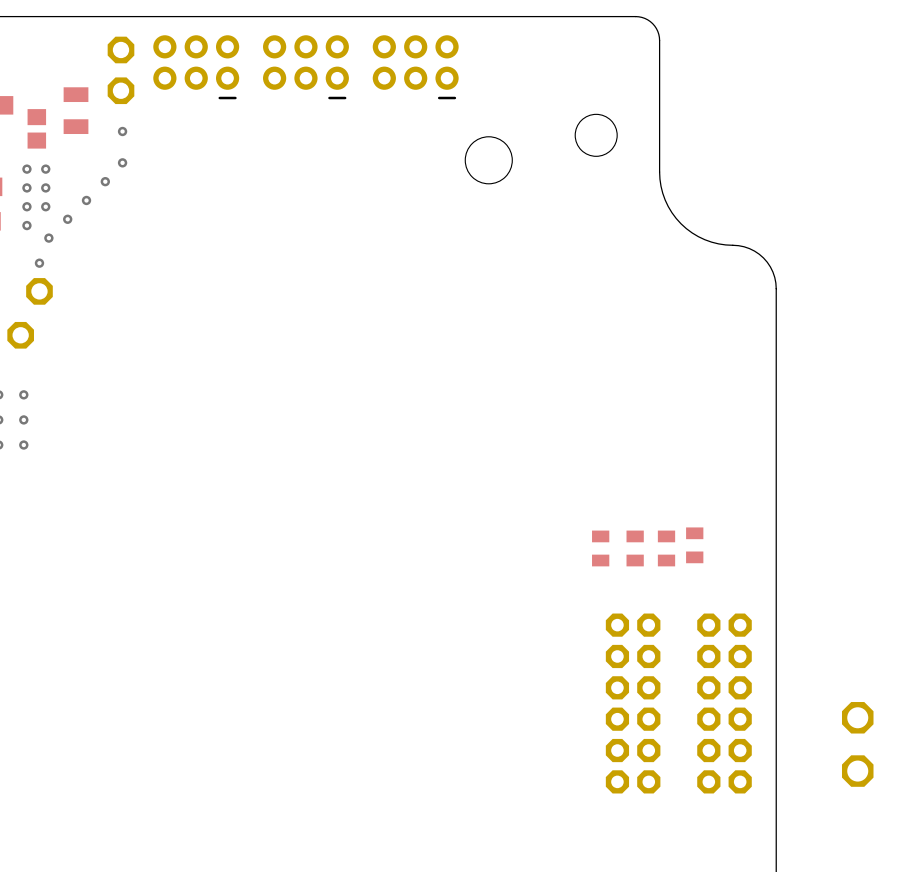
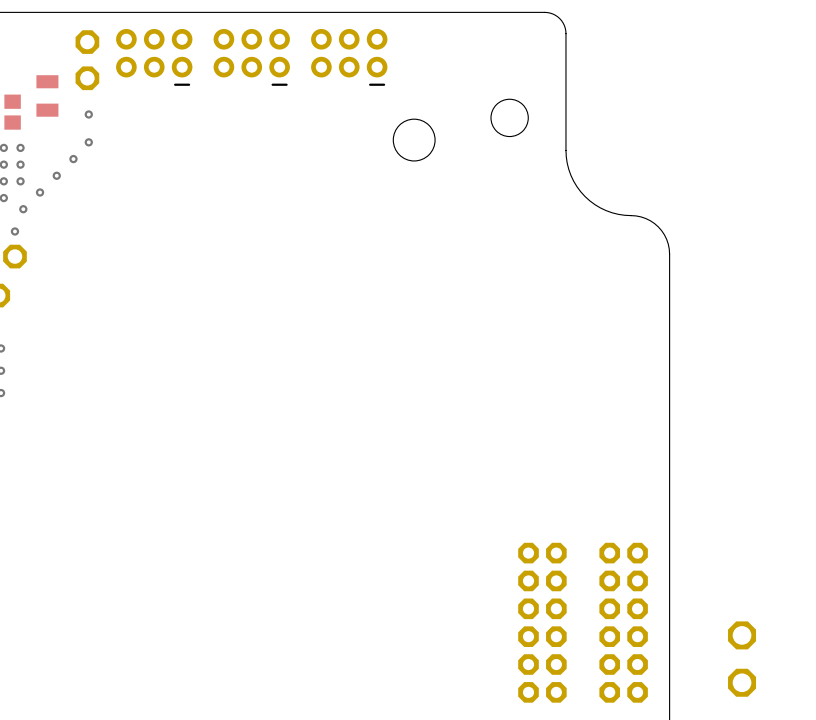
part: (694, 545) -> none
part: (600, 548) -> none
part: (635, 548) -> none
part: (666, 548) -> none

